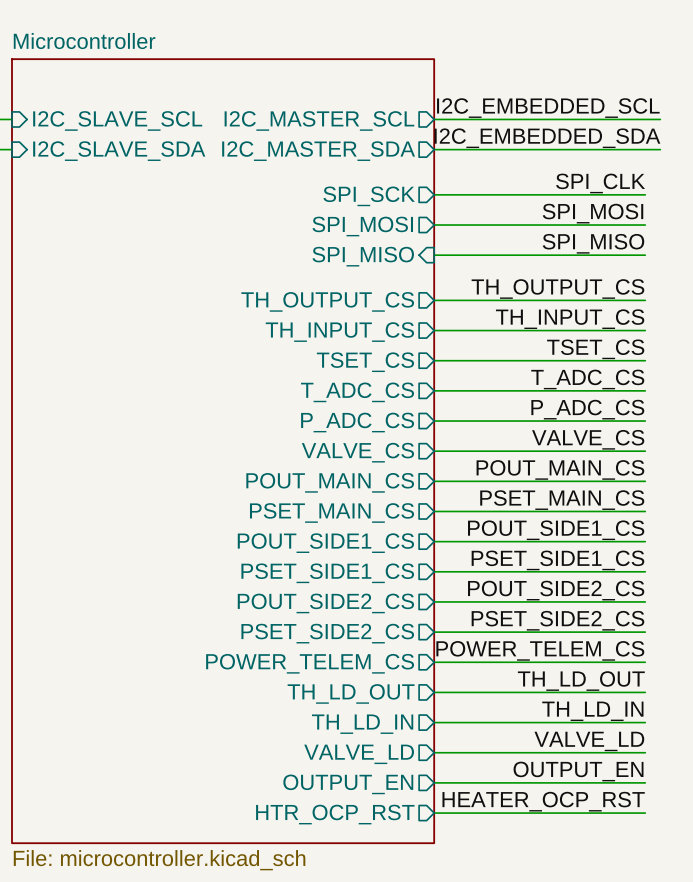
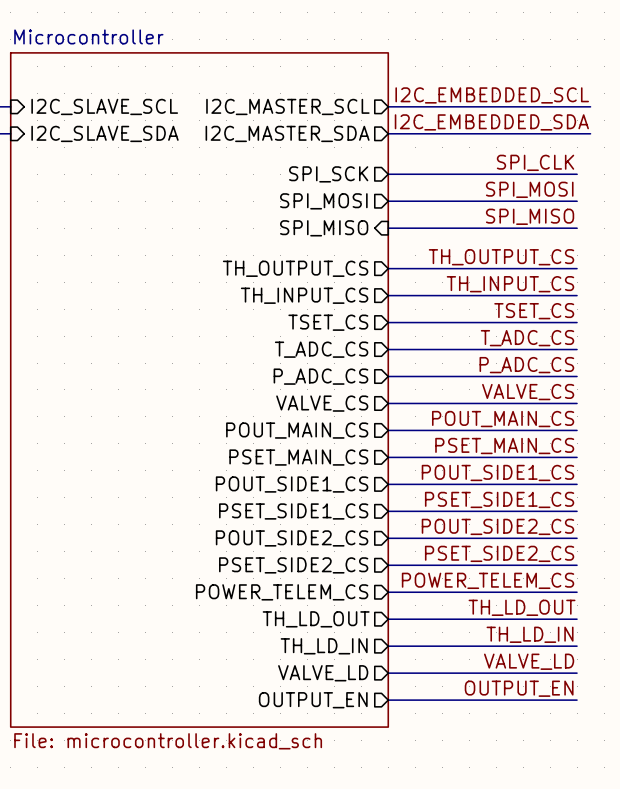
sheet Microcontroller: none -> File: microcontroller.kicad_sch (199, 389)
sheet Microcontroller: File: microcontroller.kicad_sch (223, 451) -> none
label: HEATER_OCP_RST (543, 801) -> none
wire: (434, 813) (645, 813) -> none
sheet pin: HTR_OCP_RST (335, 814) -> none

